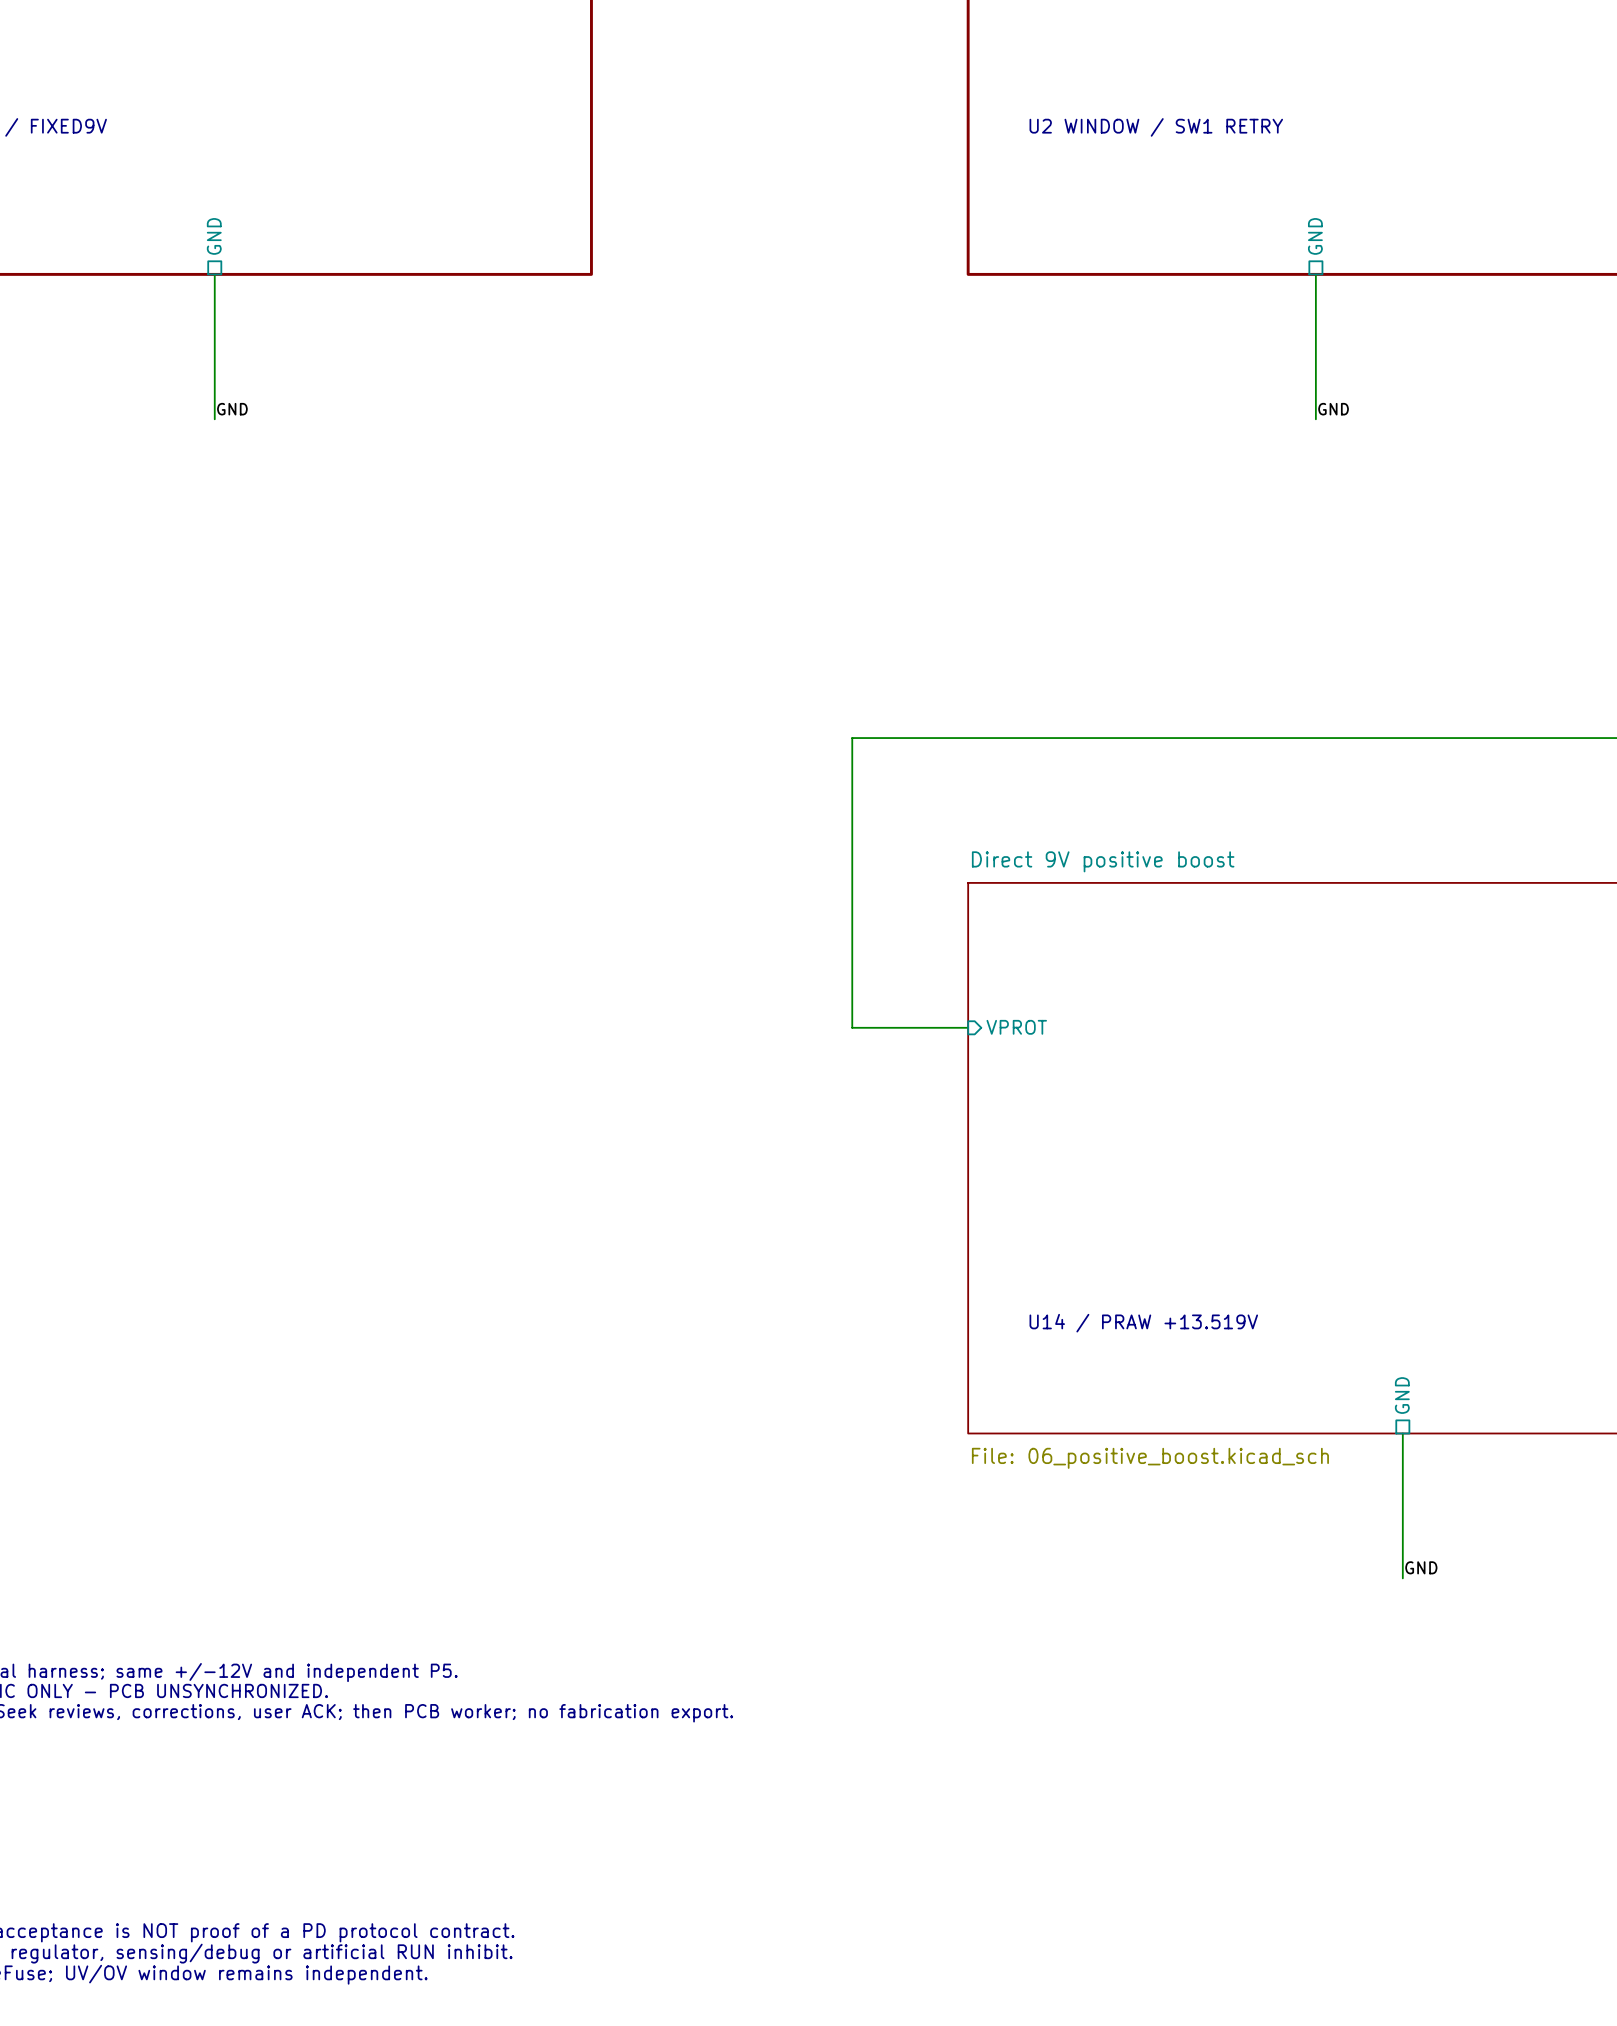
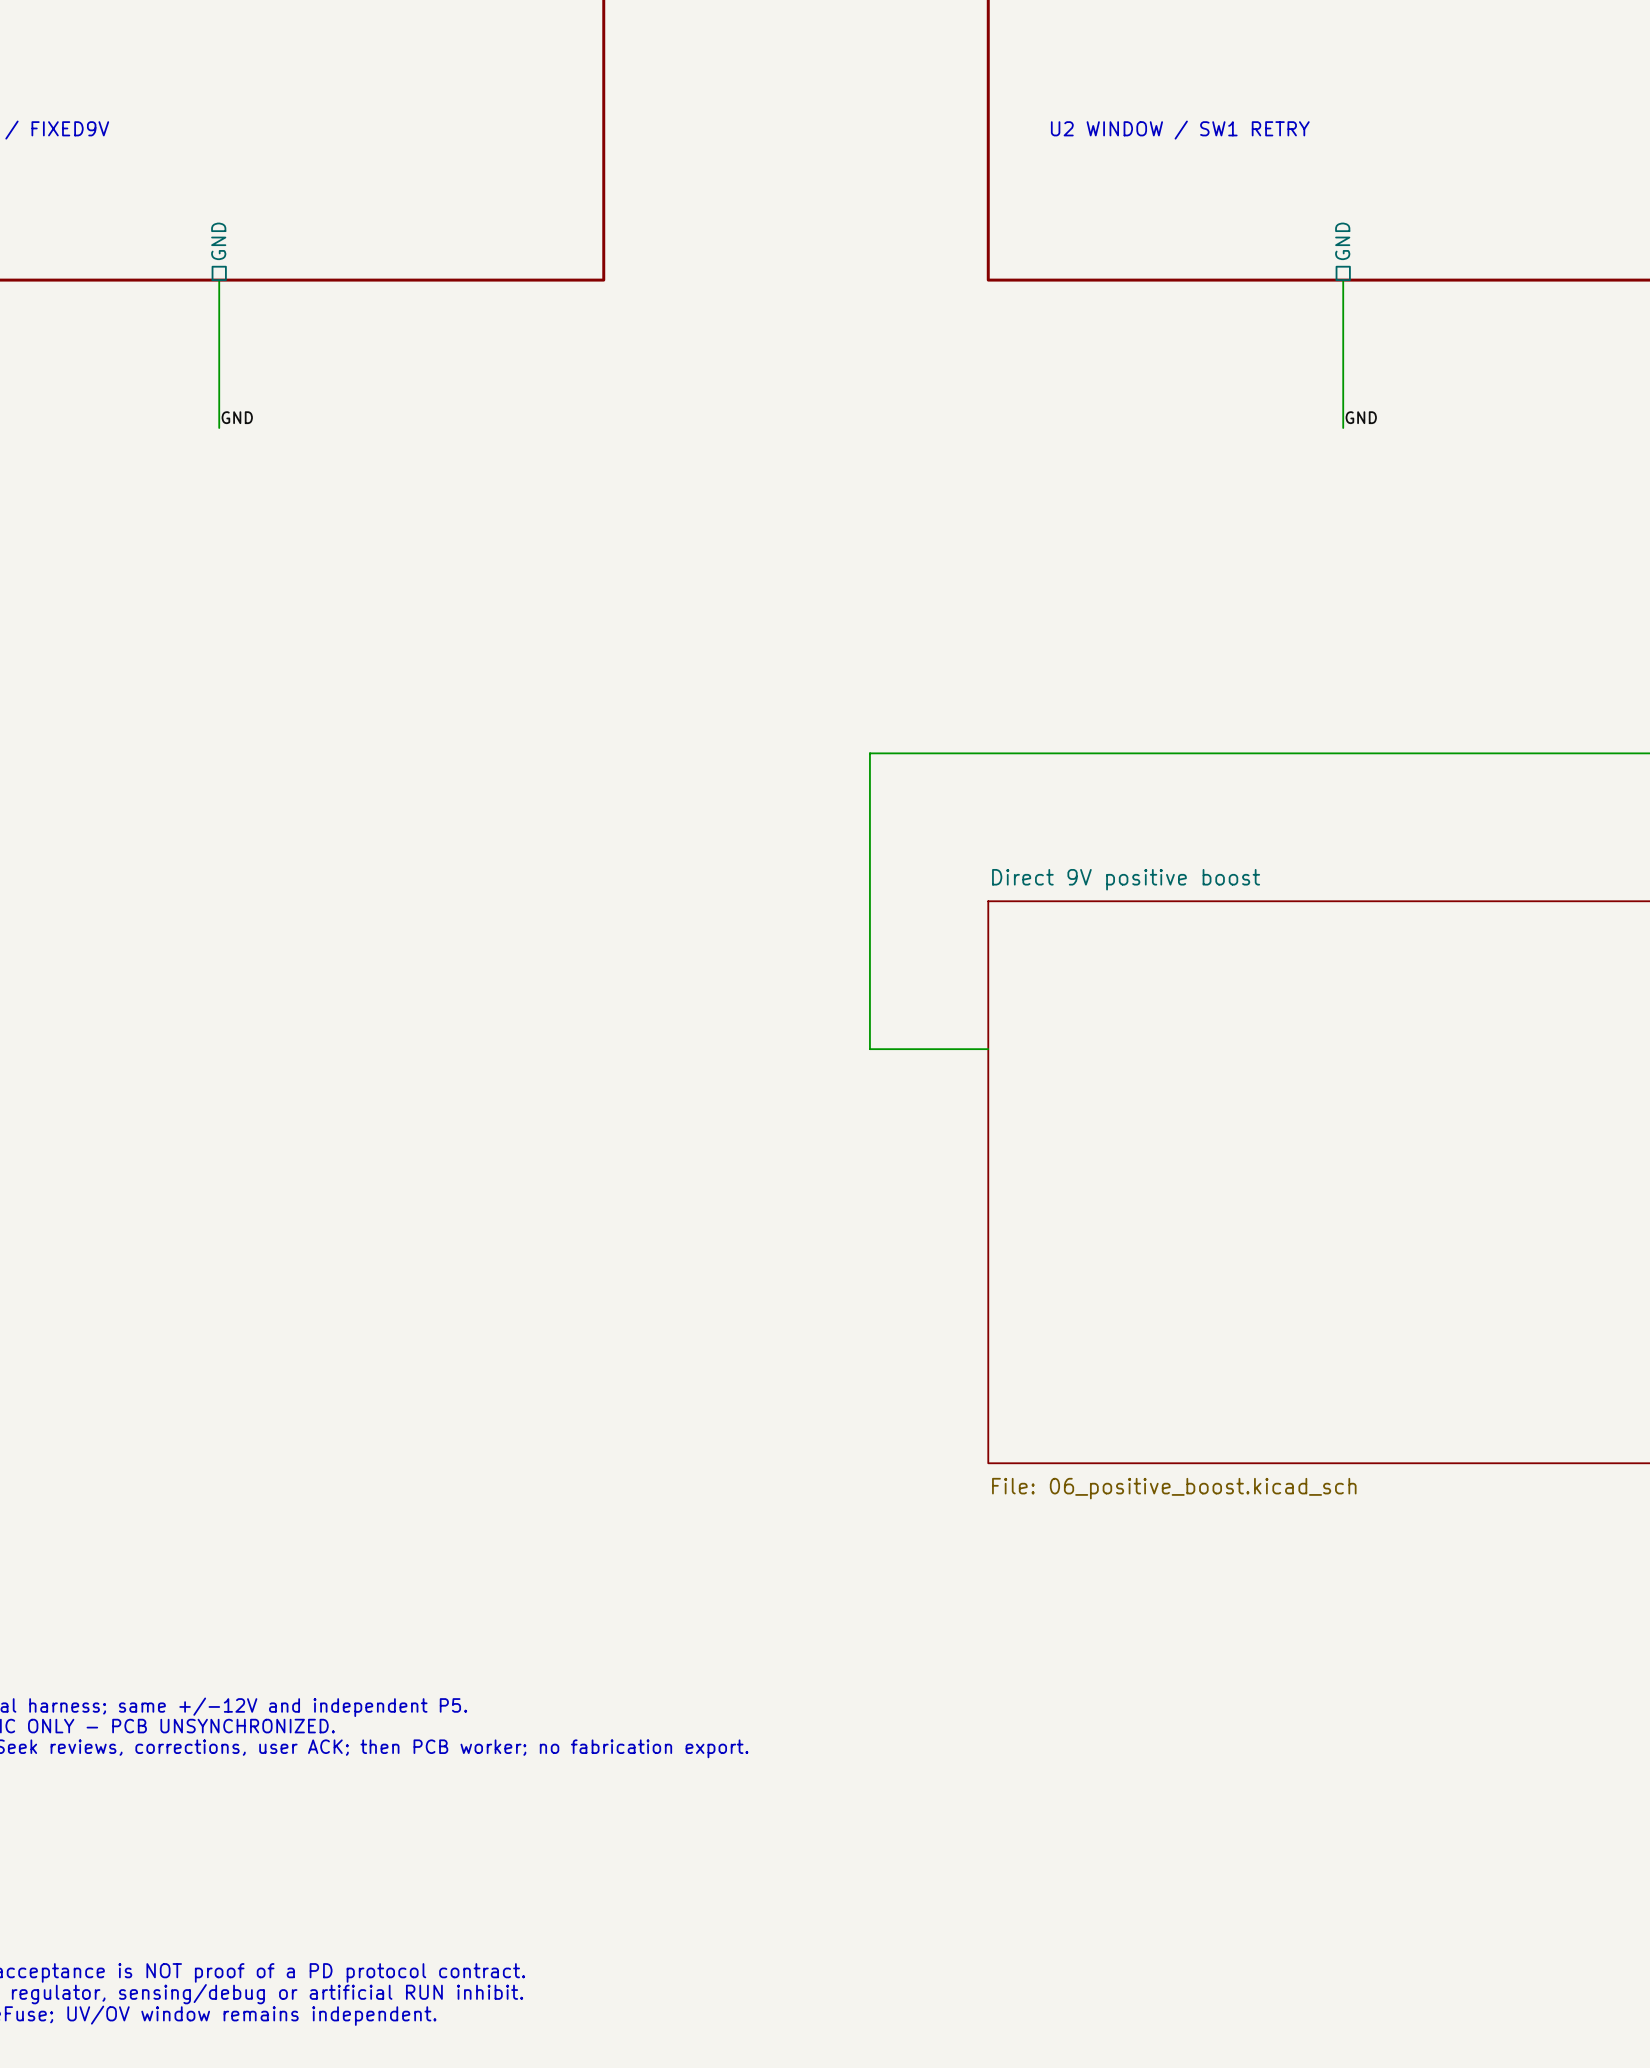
sheet pin: VPROT (1016, 1027) -> none
text: U14 / PRAW +13.519V (1143, 1323) -> none
sheet pin: GND (1402, 1395) -> none
wire: (1402, 1433) (1402, 1578) -> none
label: GND (1421, 1567) -> none

